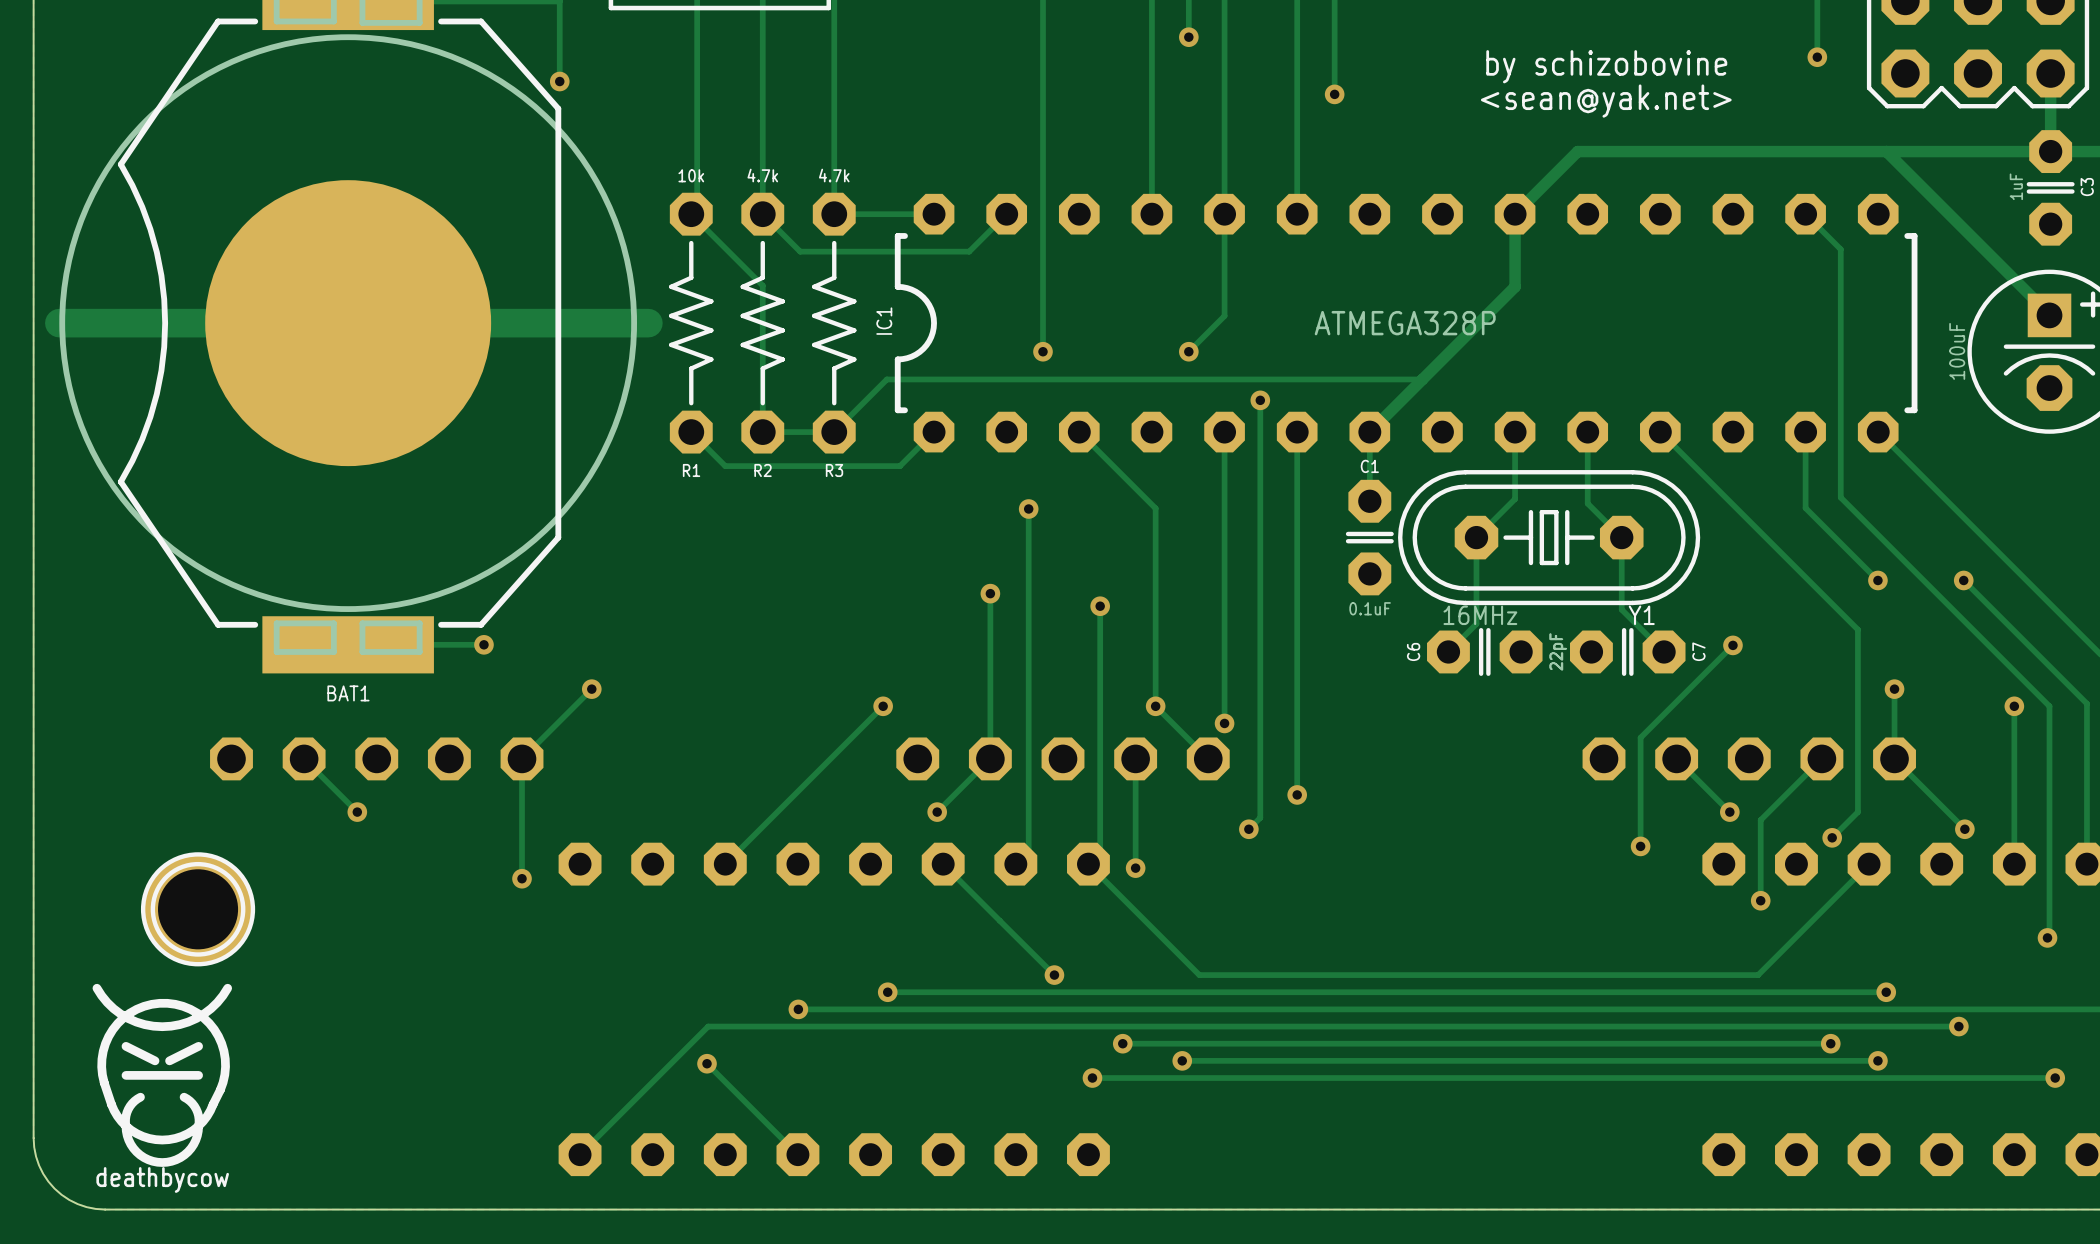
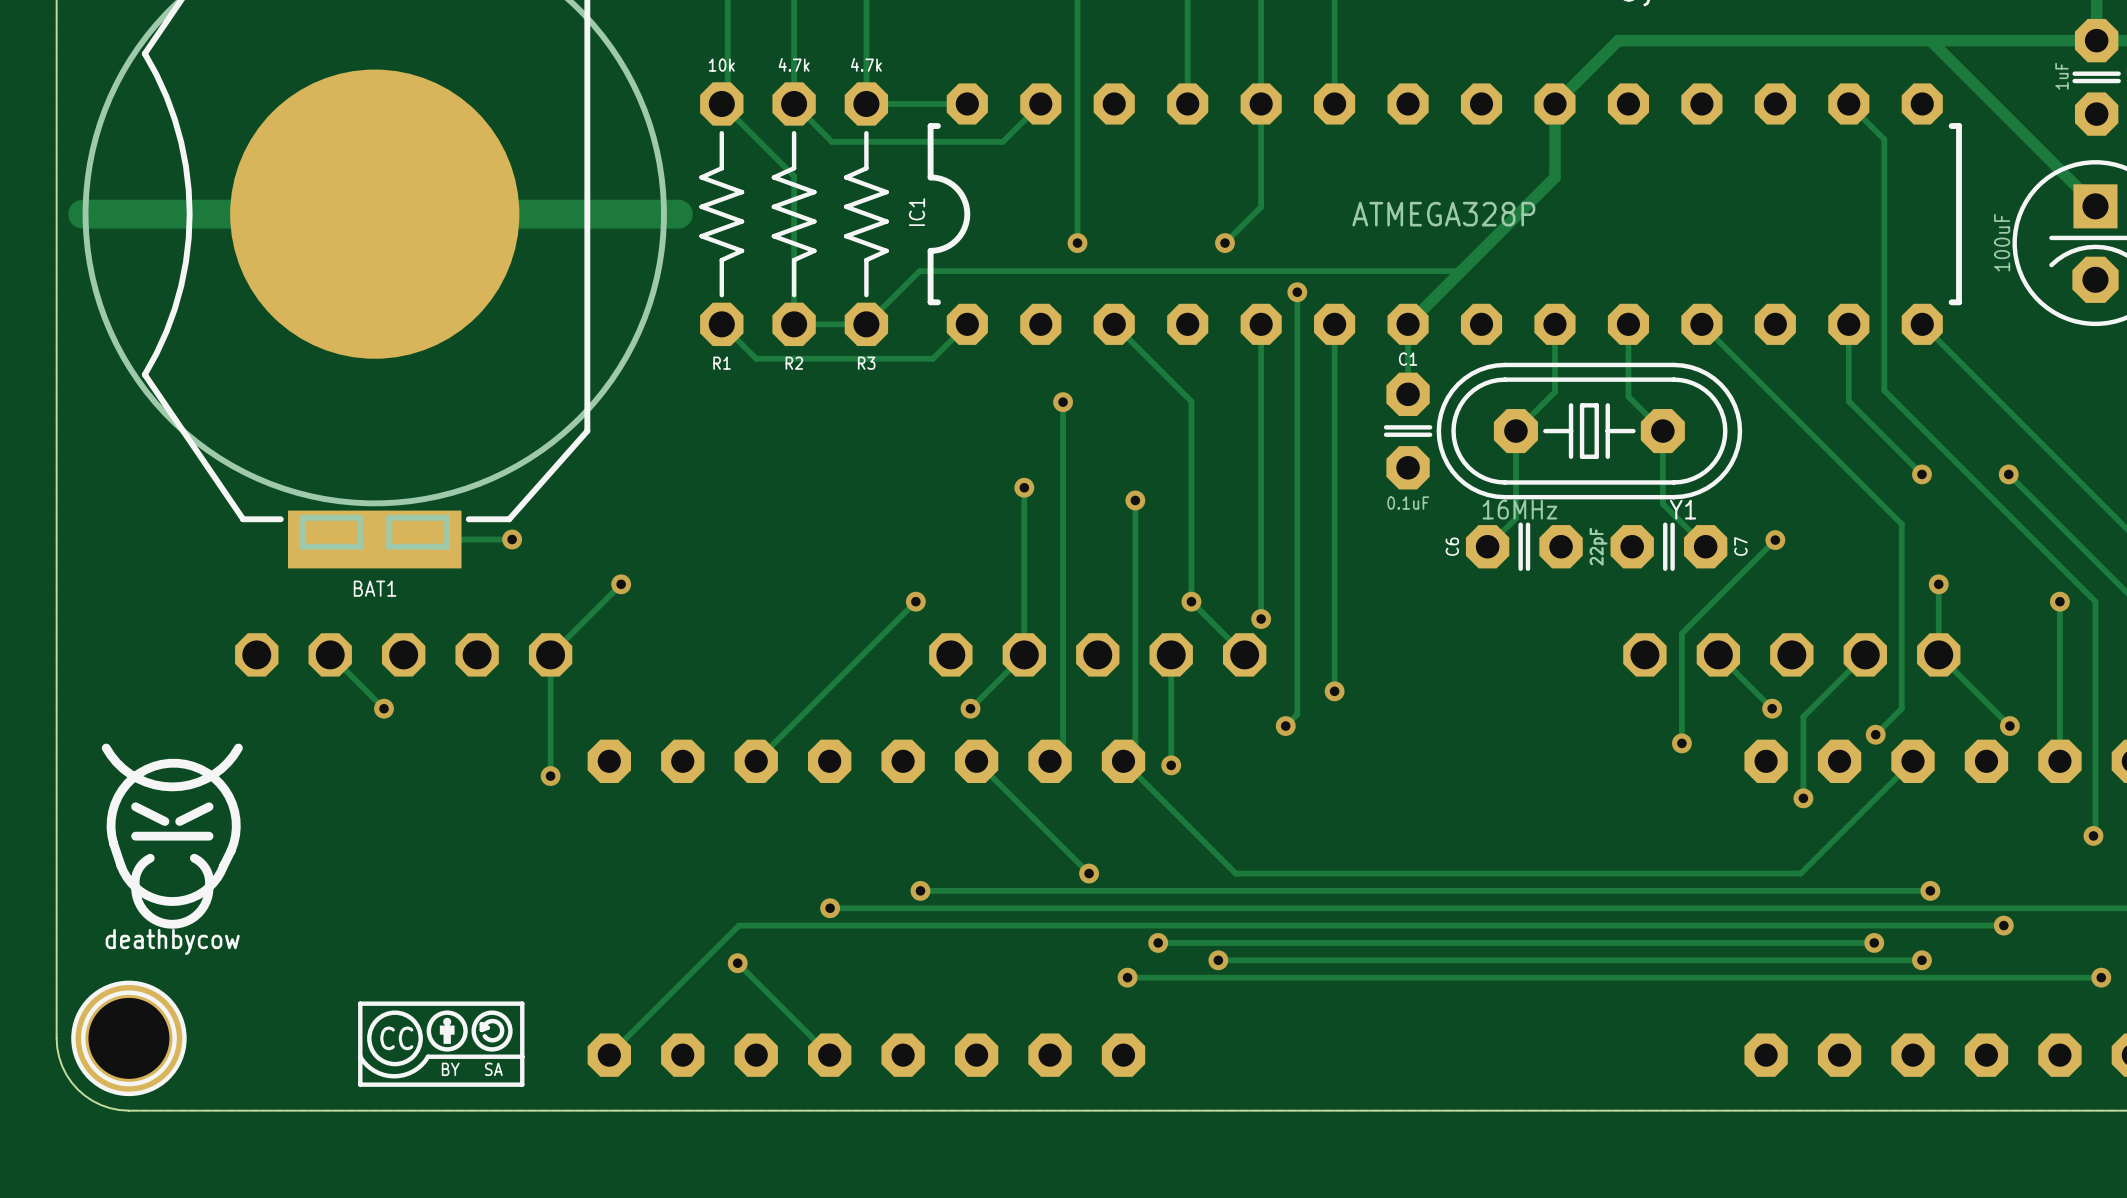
part position: (198, 909) -> (128, 1038)
drawing position: (162, 1075) -> (172, 836)
drawing: none -> [358, 1001, 525, 1087]

